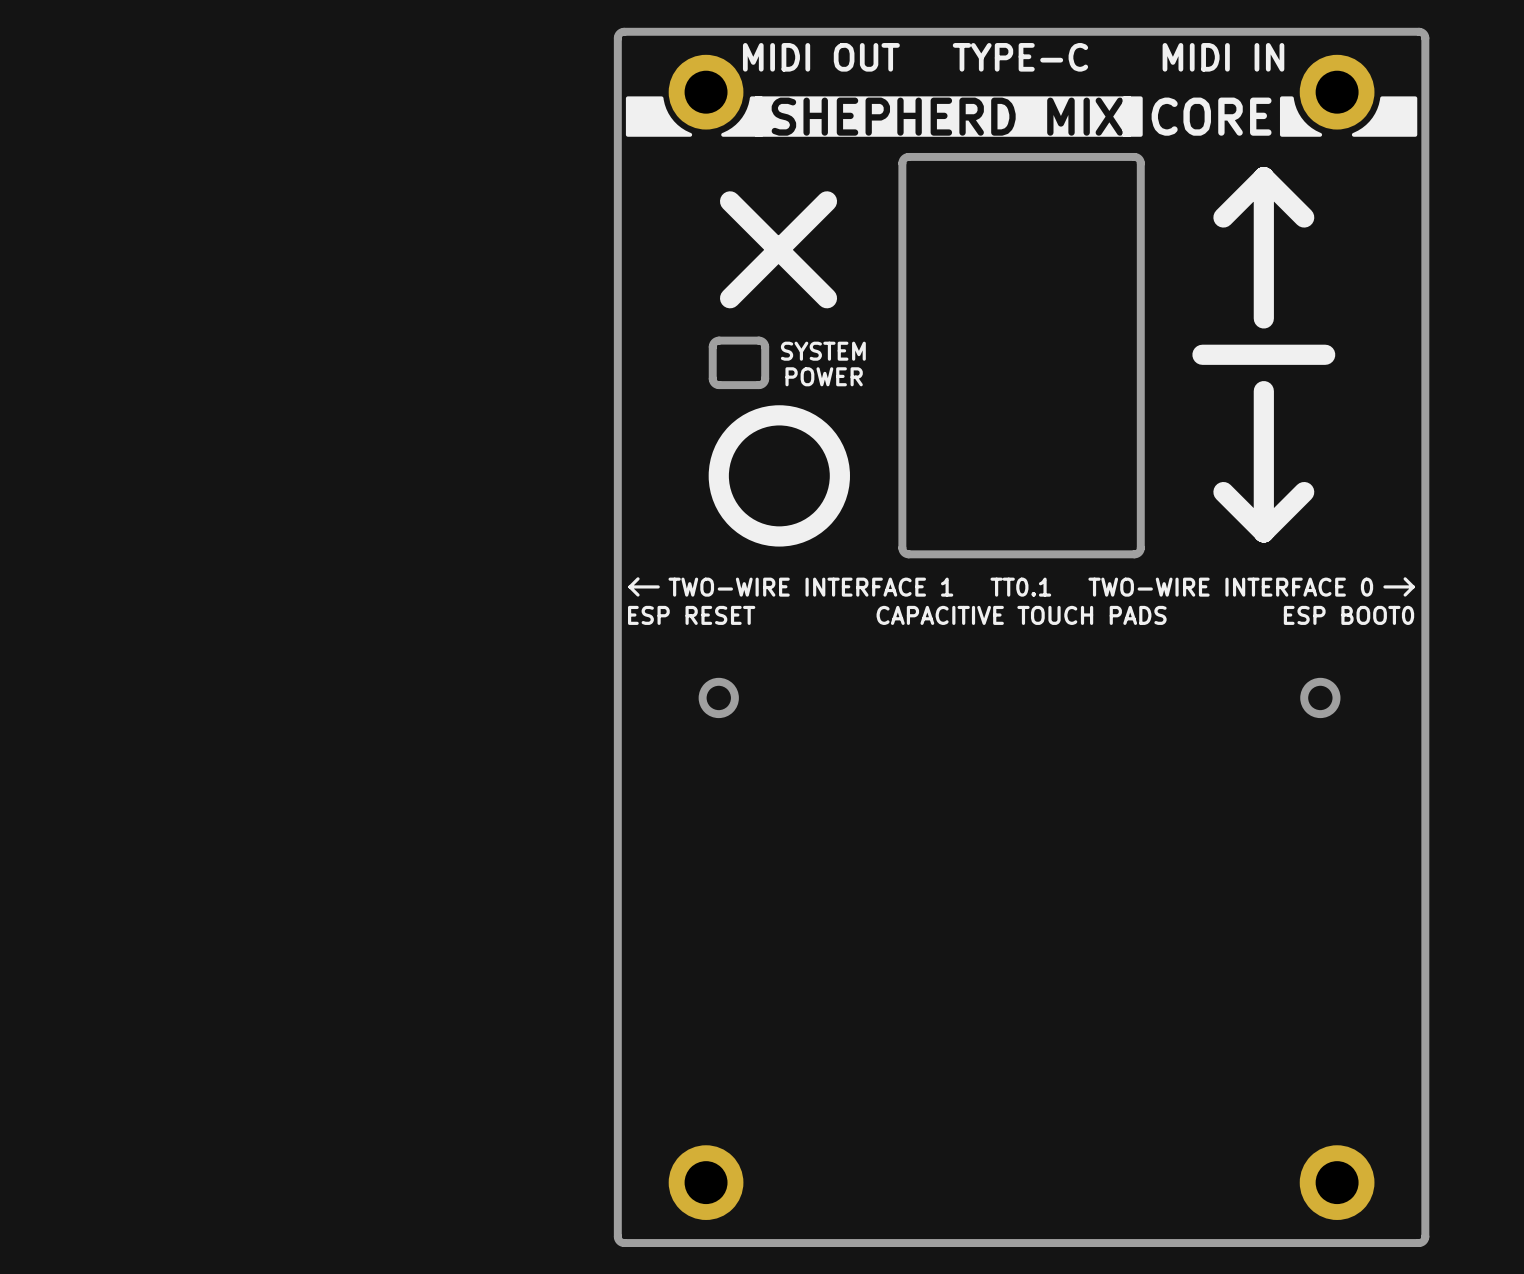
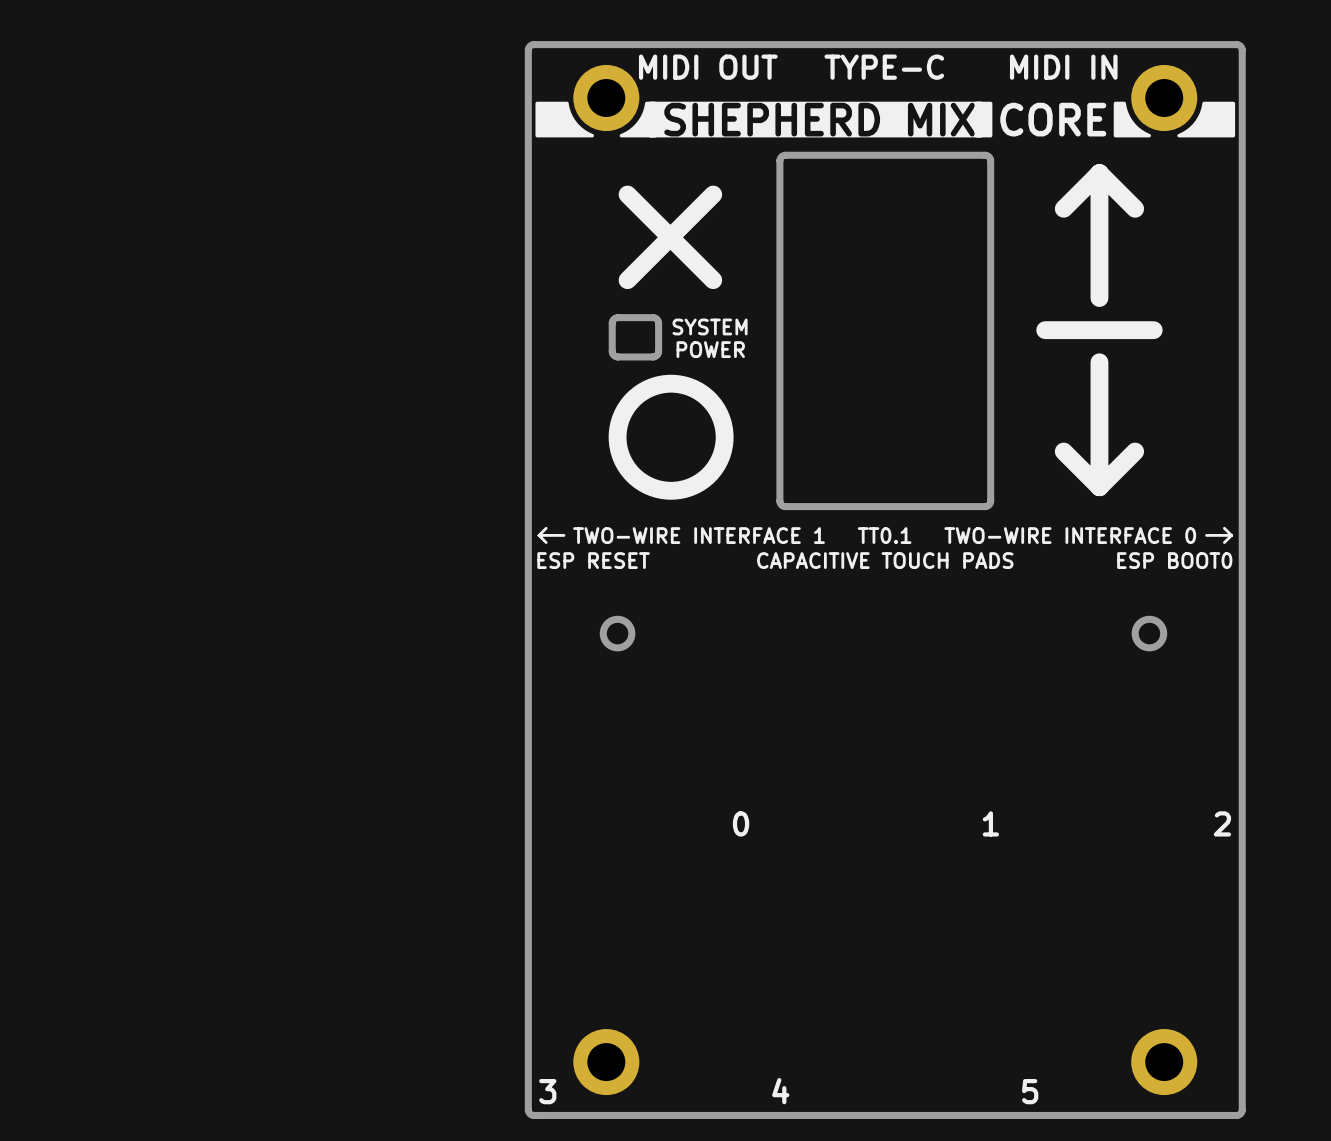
text: none -> 0 (741, 823)
text: none -> 1 (990, 823)
text: none -> 2 (1222, 823)
text: none -> 4 (780, 1091)
text: none -> 3 (547, 1091)
text: none -> 5 (1030, 1091)

